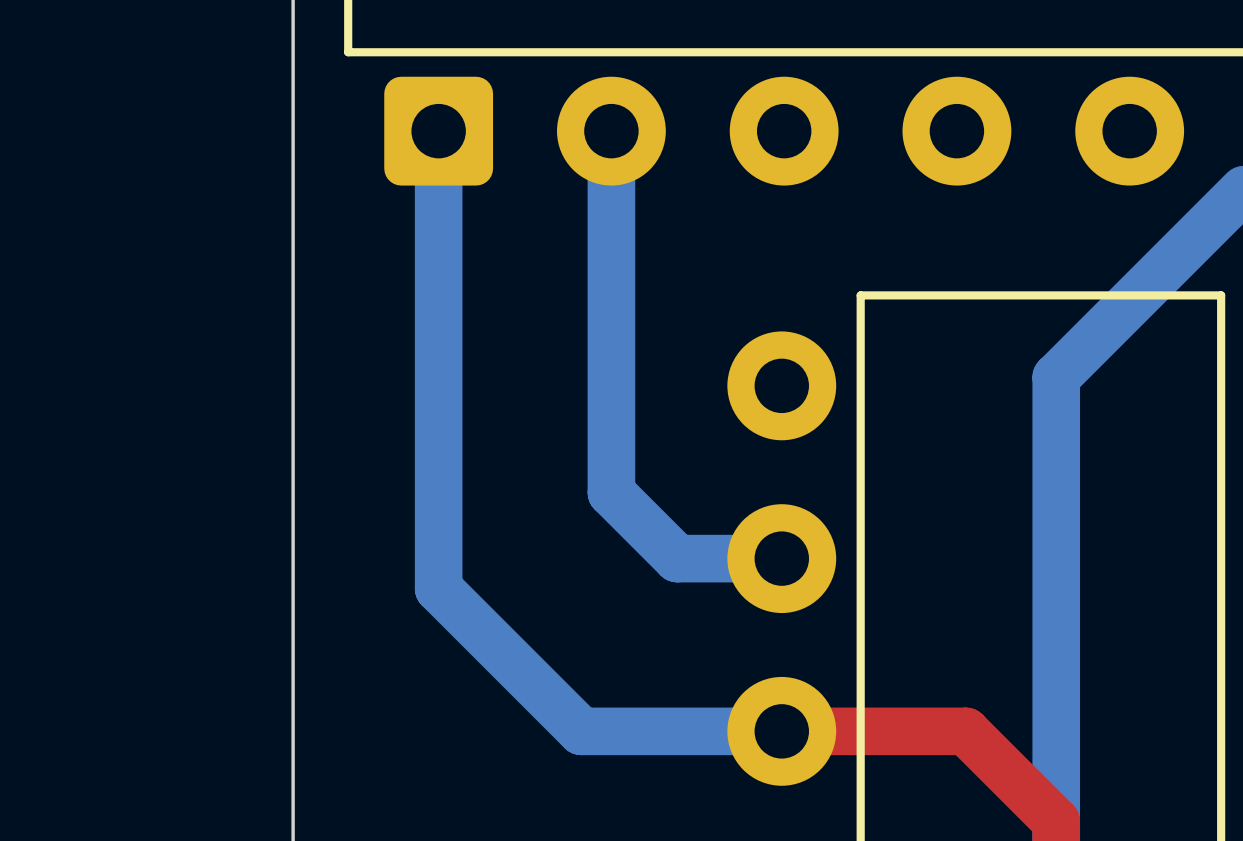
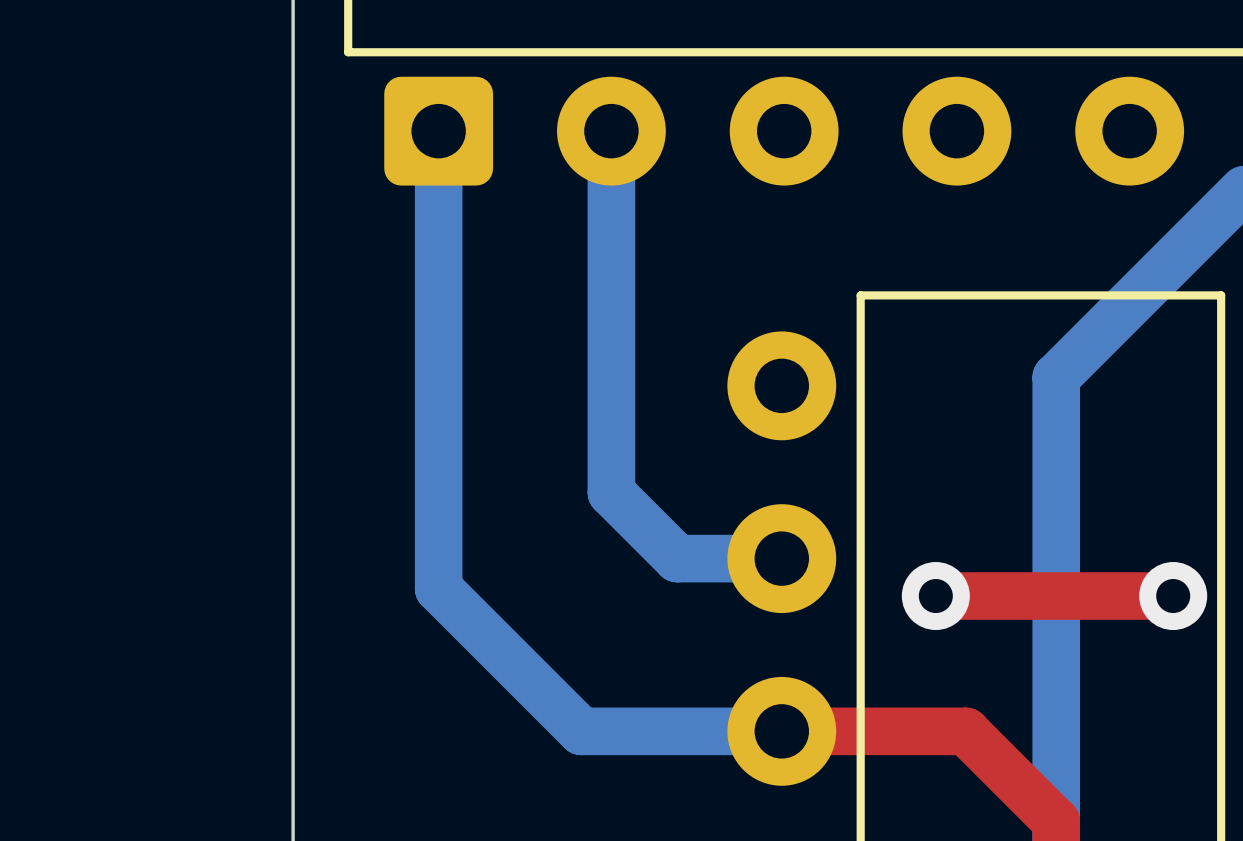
top track: none -> (935, 596) (1173, 596)
via: none -> (935, 596)
via: none -> (1173, 596)

